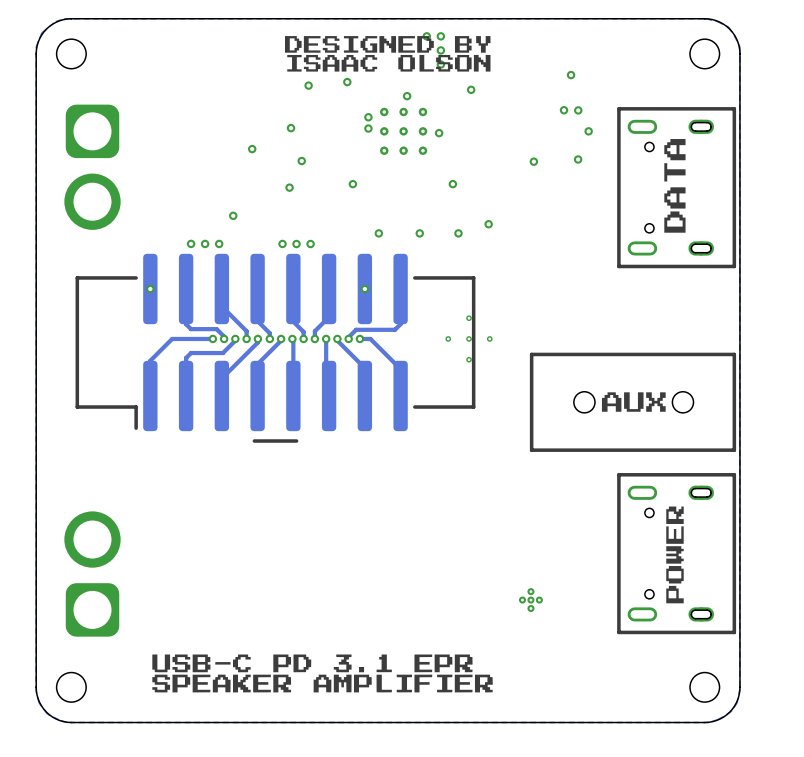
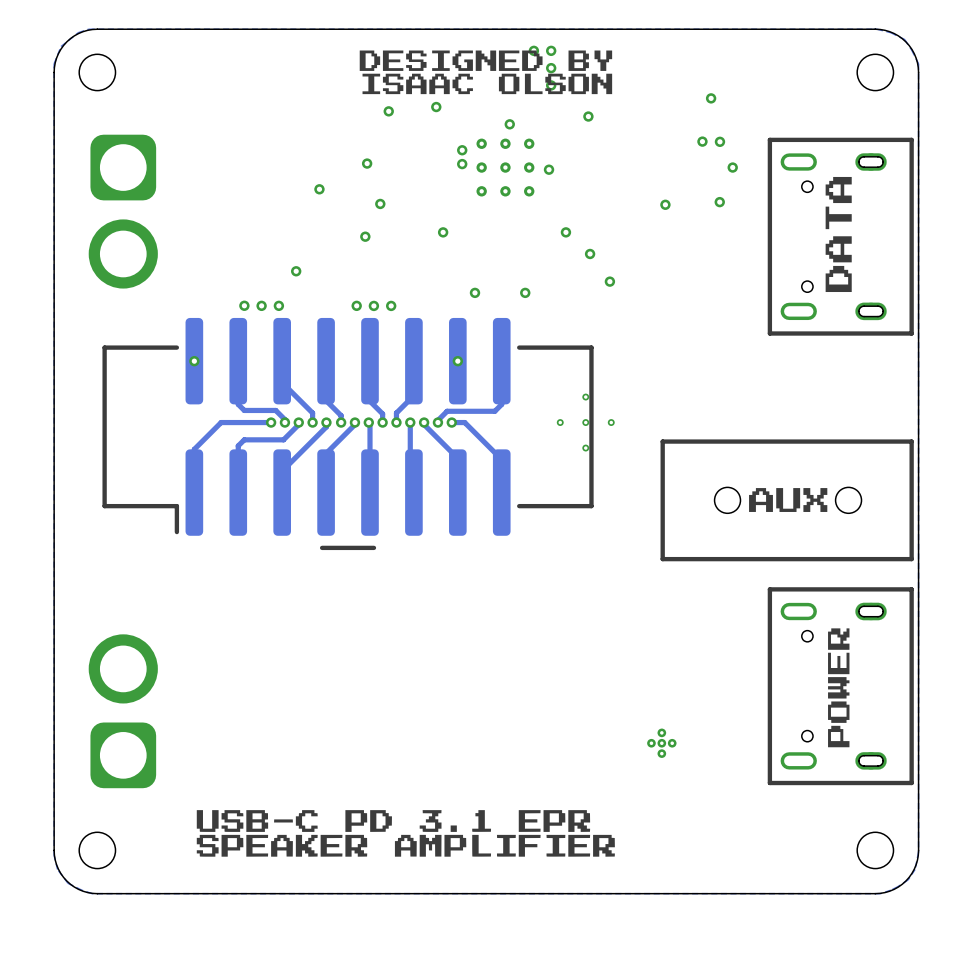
via position: (458, 233) -> (590, 253)

